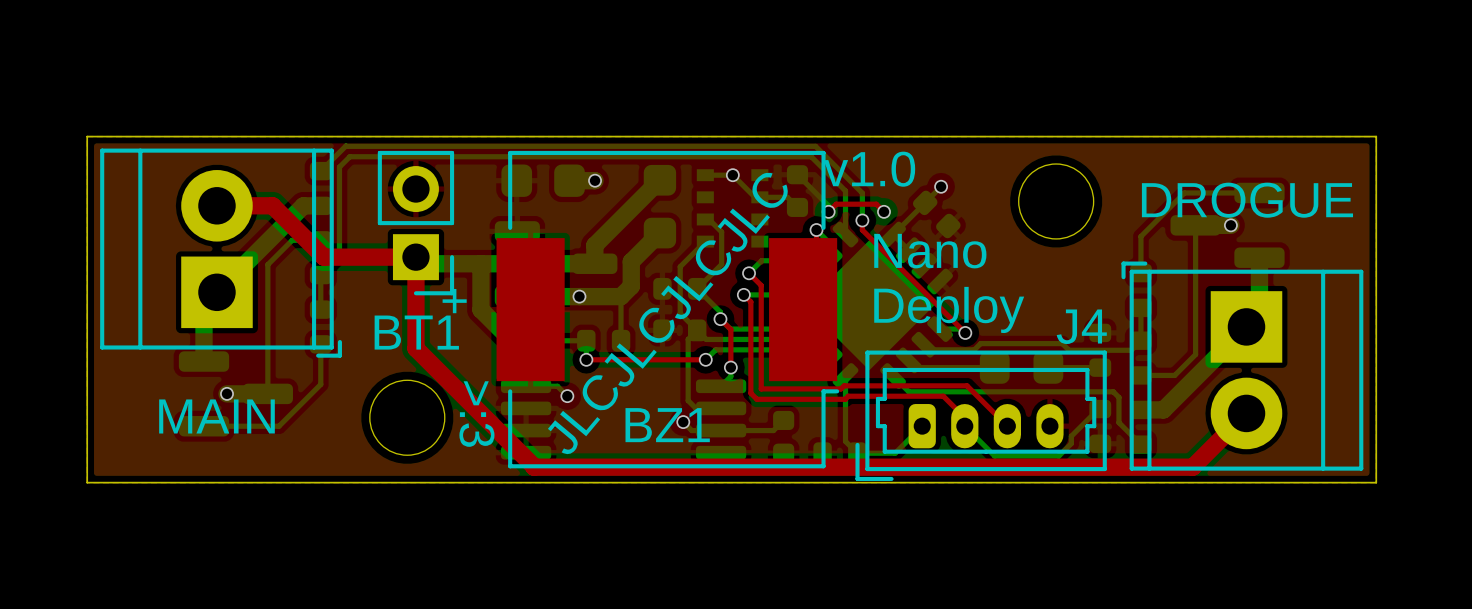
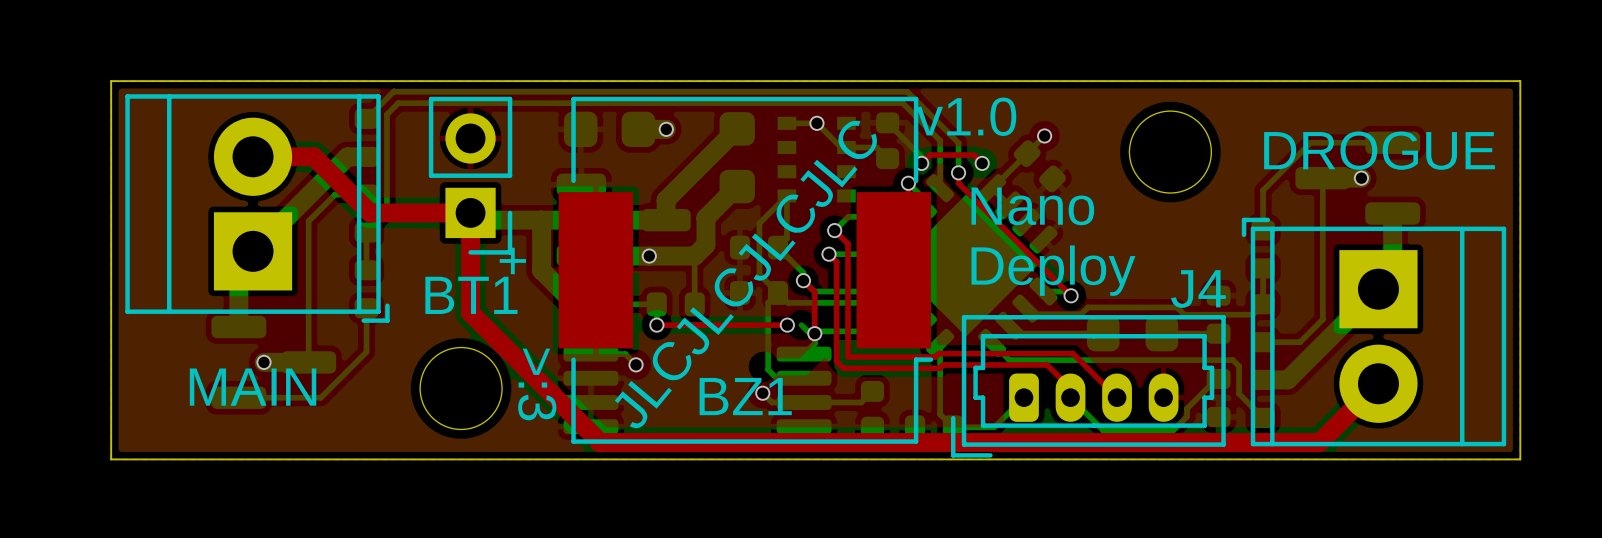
bottom track: (705, 219) (709, 219) (721, 232) (721, 264) (705, 280) -> (786, 195) (786, 238)
bottom track: (705, 359) (715, 349) (773, 349) (789, 365) -> (801, 325) (807, 331) (878, 331)

